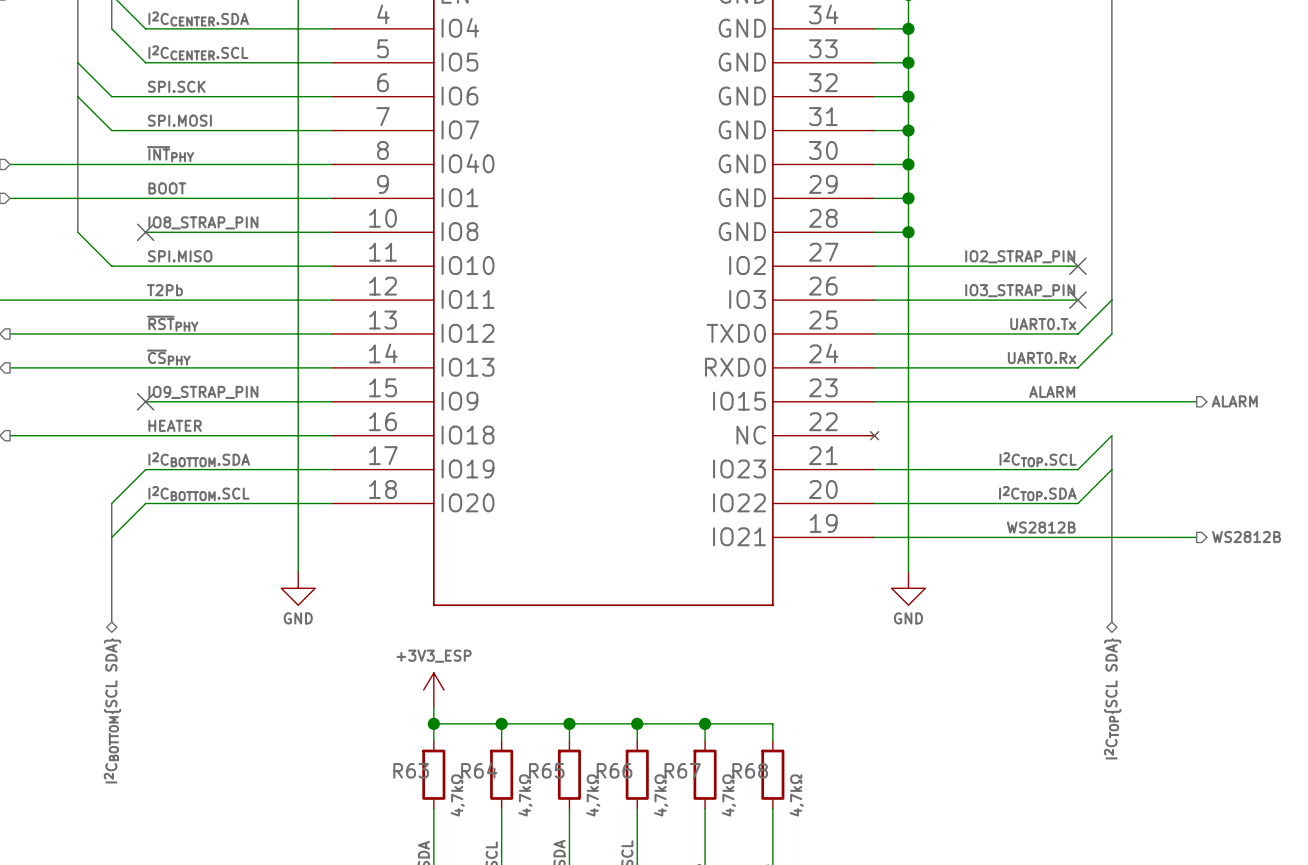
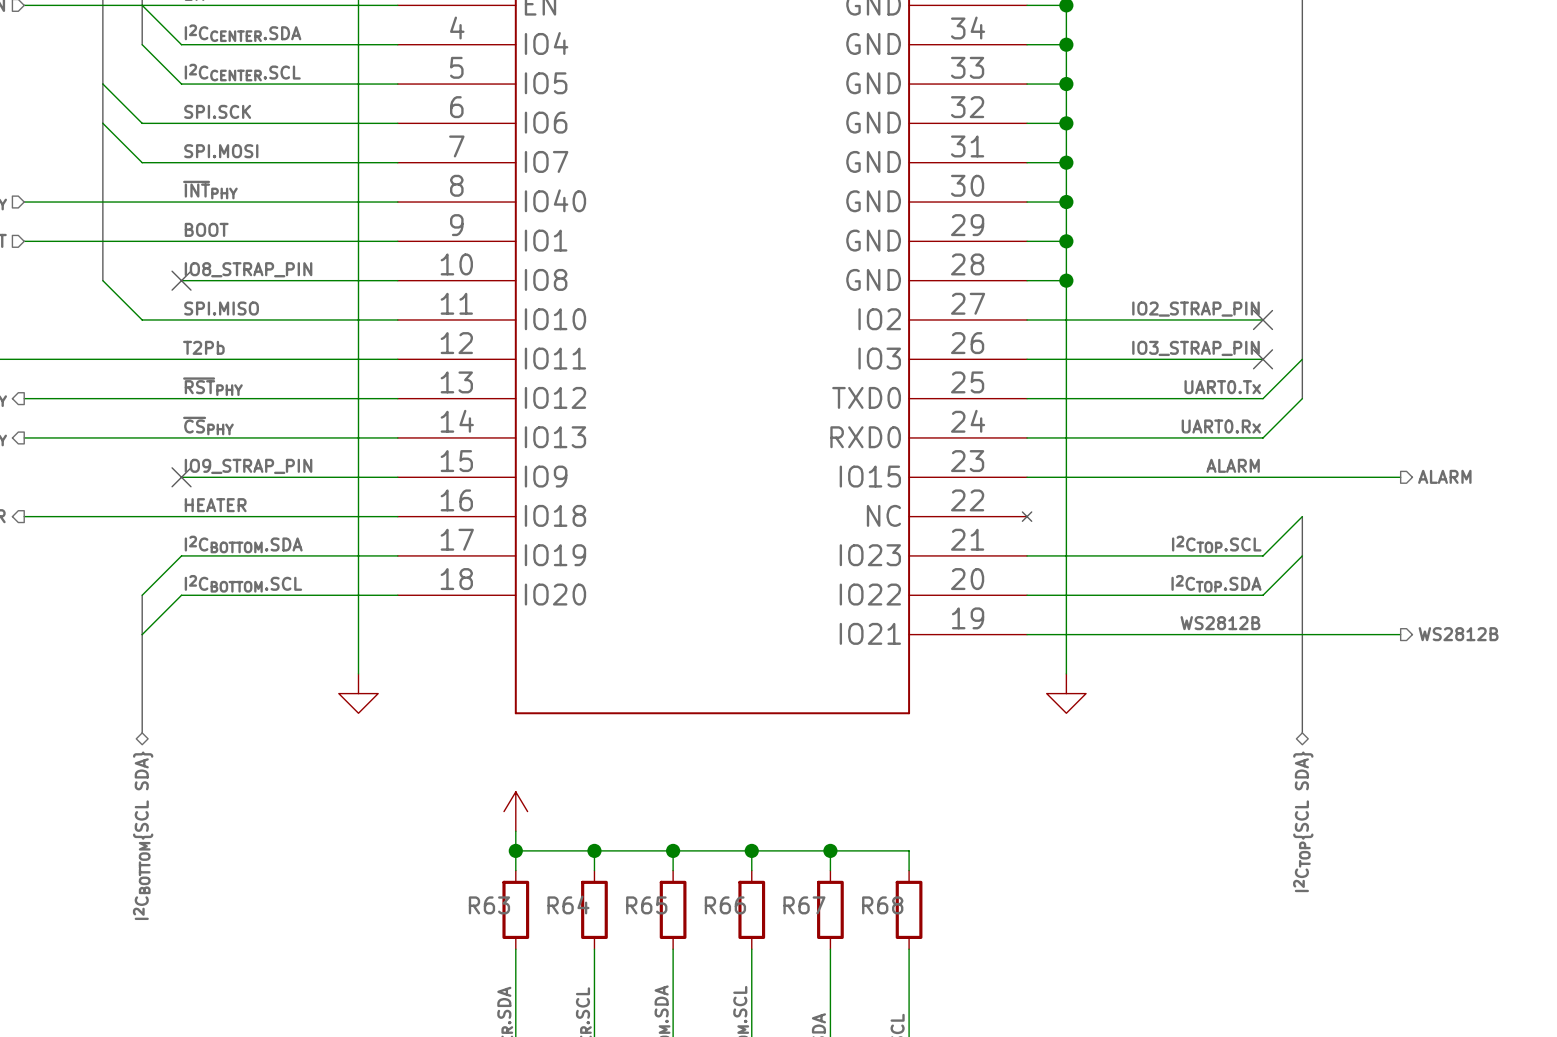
power symbol text: GND (298, 618) -> none
power symbol text: GND (908, 618) -> none
power symbol text: +3V3_ESP (434, 656) -> none
R63 value: 4,7kΩ (457, 795) -> none
R64 value: 4,7kΩ (525, 795) -> none
R65 value: 4,7kΩ (593, 795) -> none
R66 value: 4,7kΩ (661, 795) -> none
R67 value: 4,7kΩ (728, 795) -> none
R68 value: 4,7kΩ (796, 795) -> none

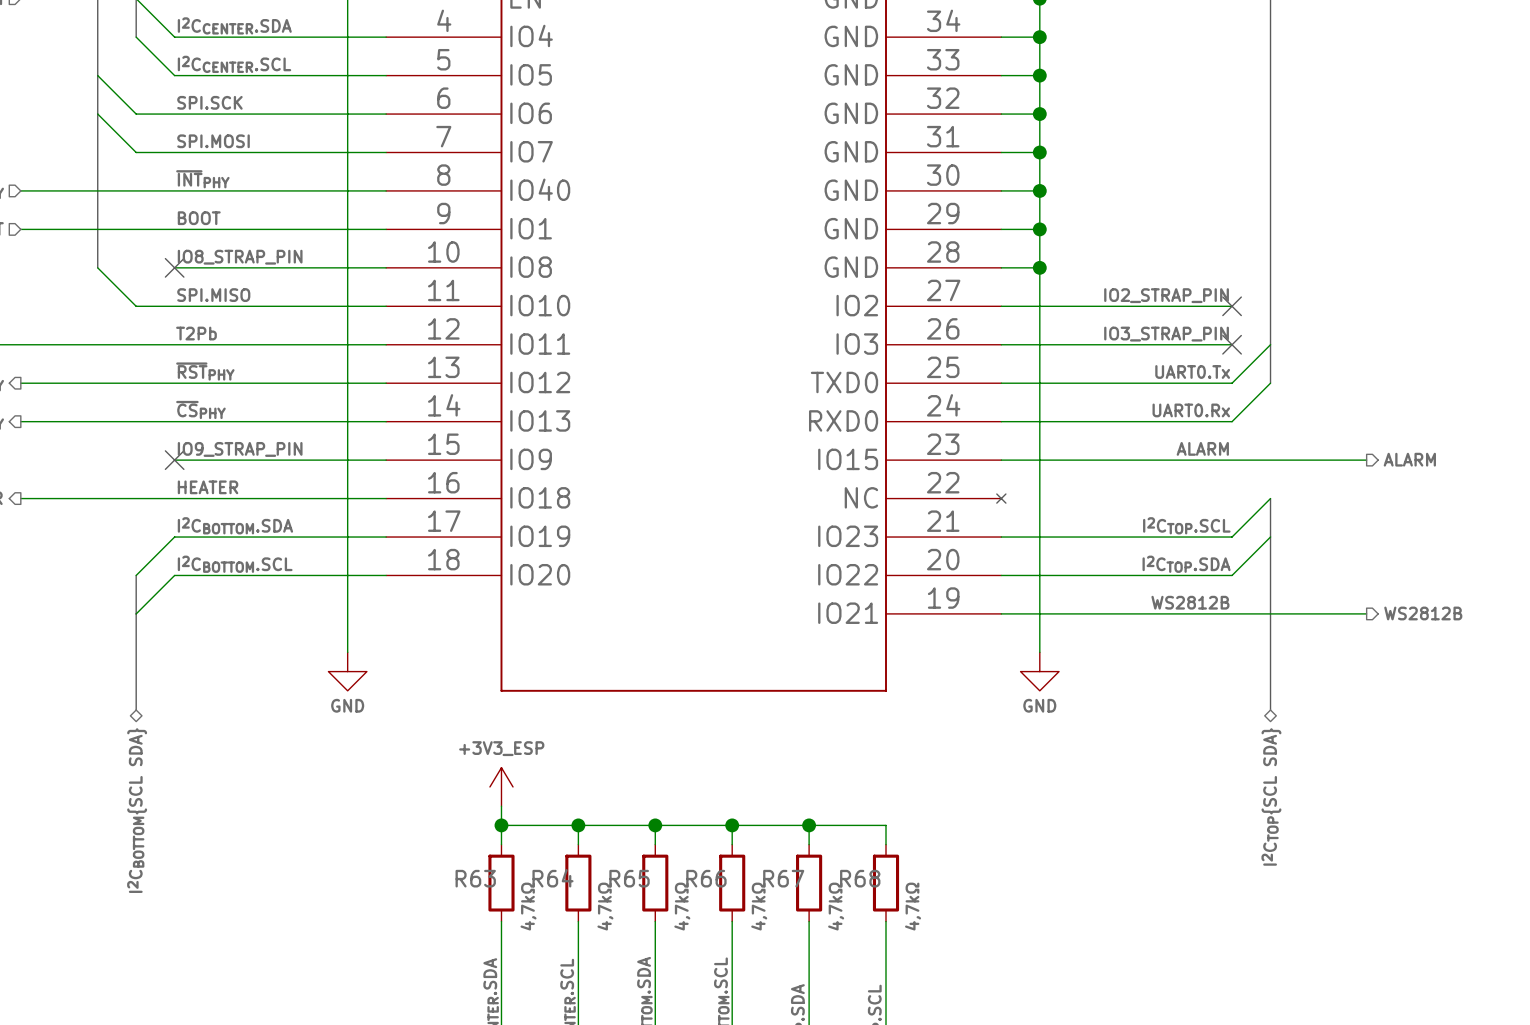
power symbol text: none -> GND (347, 705)
power symbol text: none -> GND (1039, 705)
power symbol text: none -> +3V3_ESP (501, 748)
R63 value: none -> 4,7kΩ (528, 906)
R64 value: none -> 4,7kΩ (605, 906)
R65 value: none -> 4,7kΩ (682, 906)
R66 value: none -> 4,7kΩ (759, 906)
R67 value: none -> 4,7kΩ (836, 906)
R68 value: none -> 4,7kΩ (913, 906)

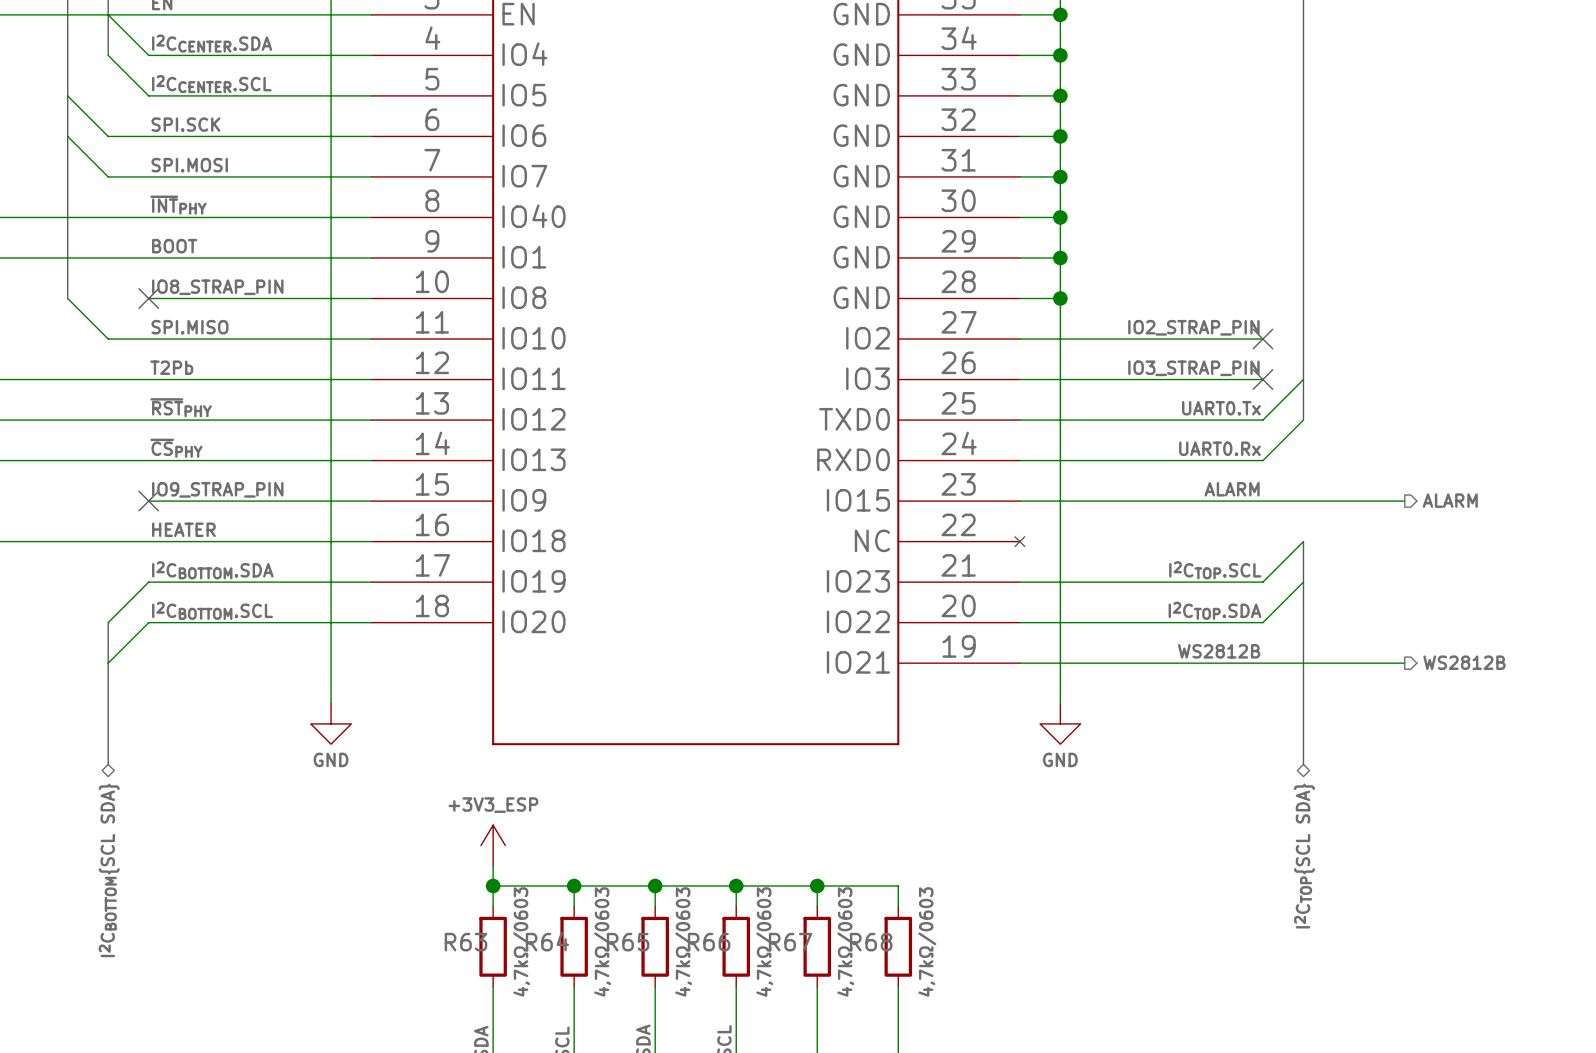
R63 value: 4,7kΩ (528, 906) -> 4,7kΩ/0603 (522, 941)
R64 value: 4,7kΩ (605, 906) -> 4,7kΩ/0603 (603, 941)
R65 value: 4,7kΩ (682, 906) -> 4,7kΩ/0603 (684, 941)
R66 value: 4,7kΩ (759, 906) -> 4,7kΩ/0603 (765, 941)
R67 value: 4,7kΩ (836, 906) -> 4,7kΩ/0603 (846, 941)
R68 value: 4,7kΩ (913, 906) -> 4,7kΩ/0603 (927, 941)

